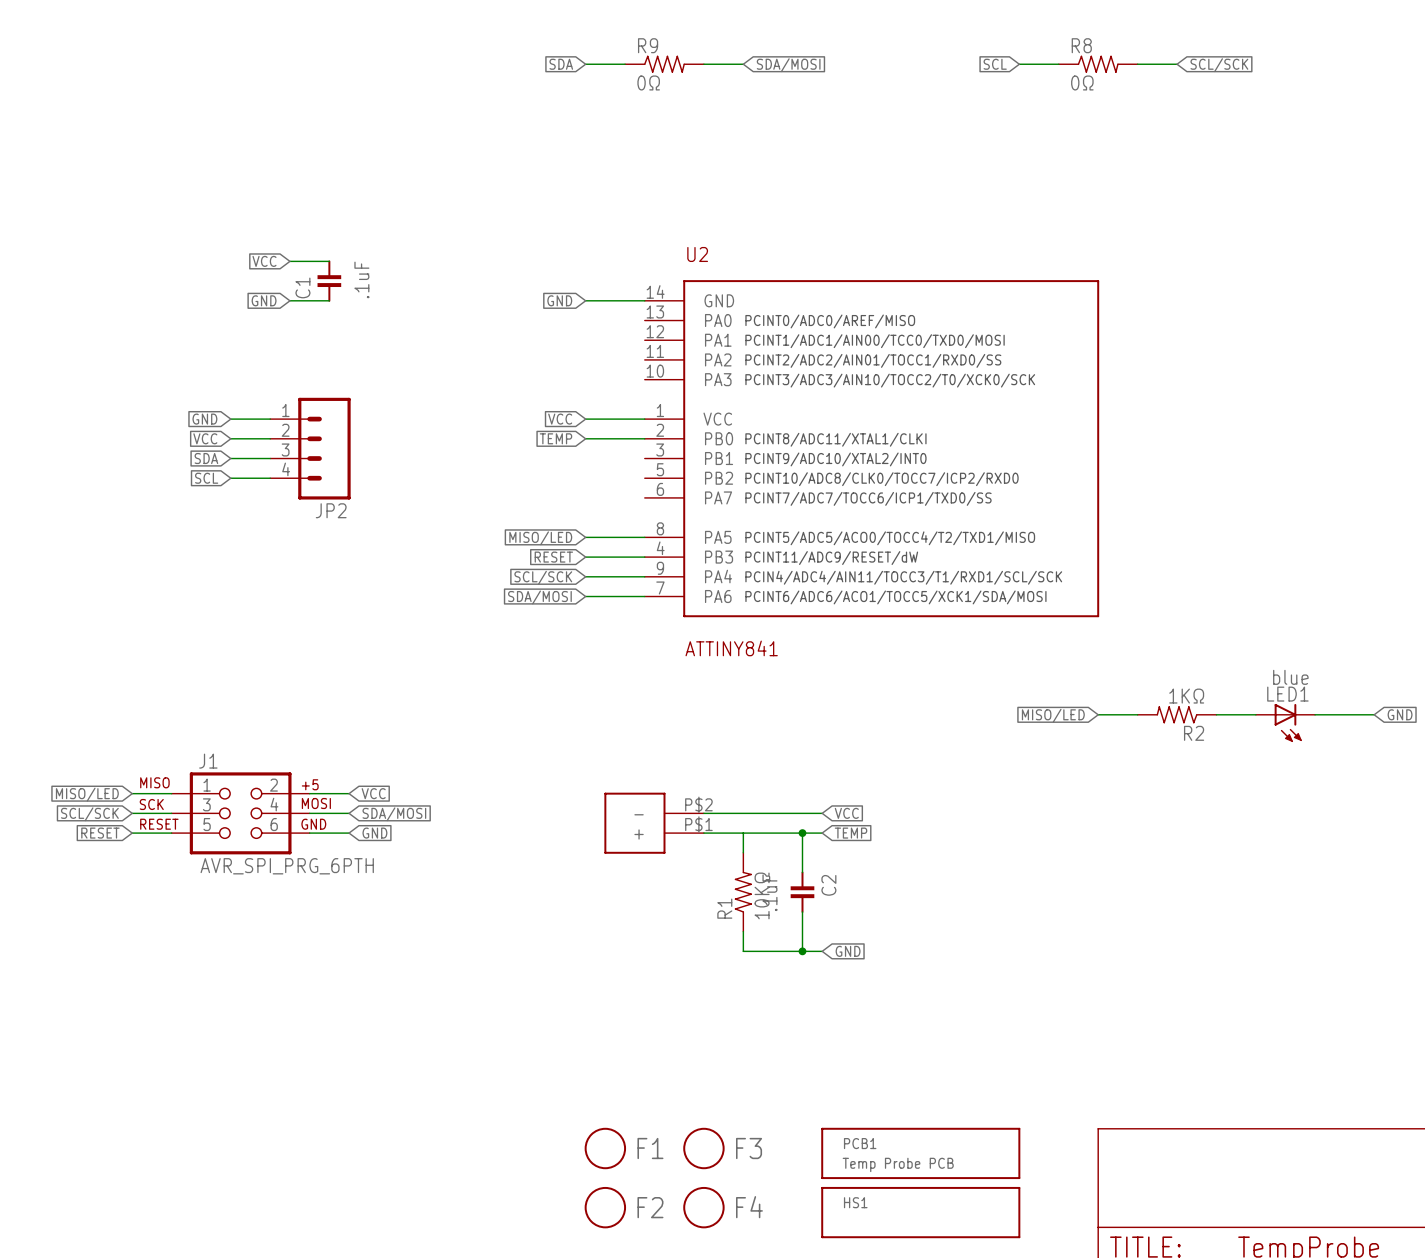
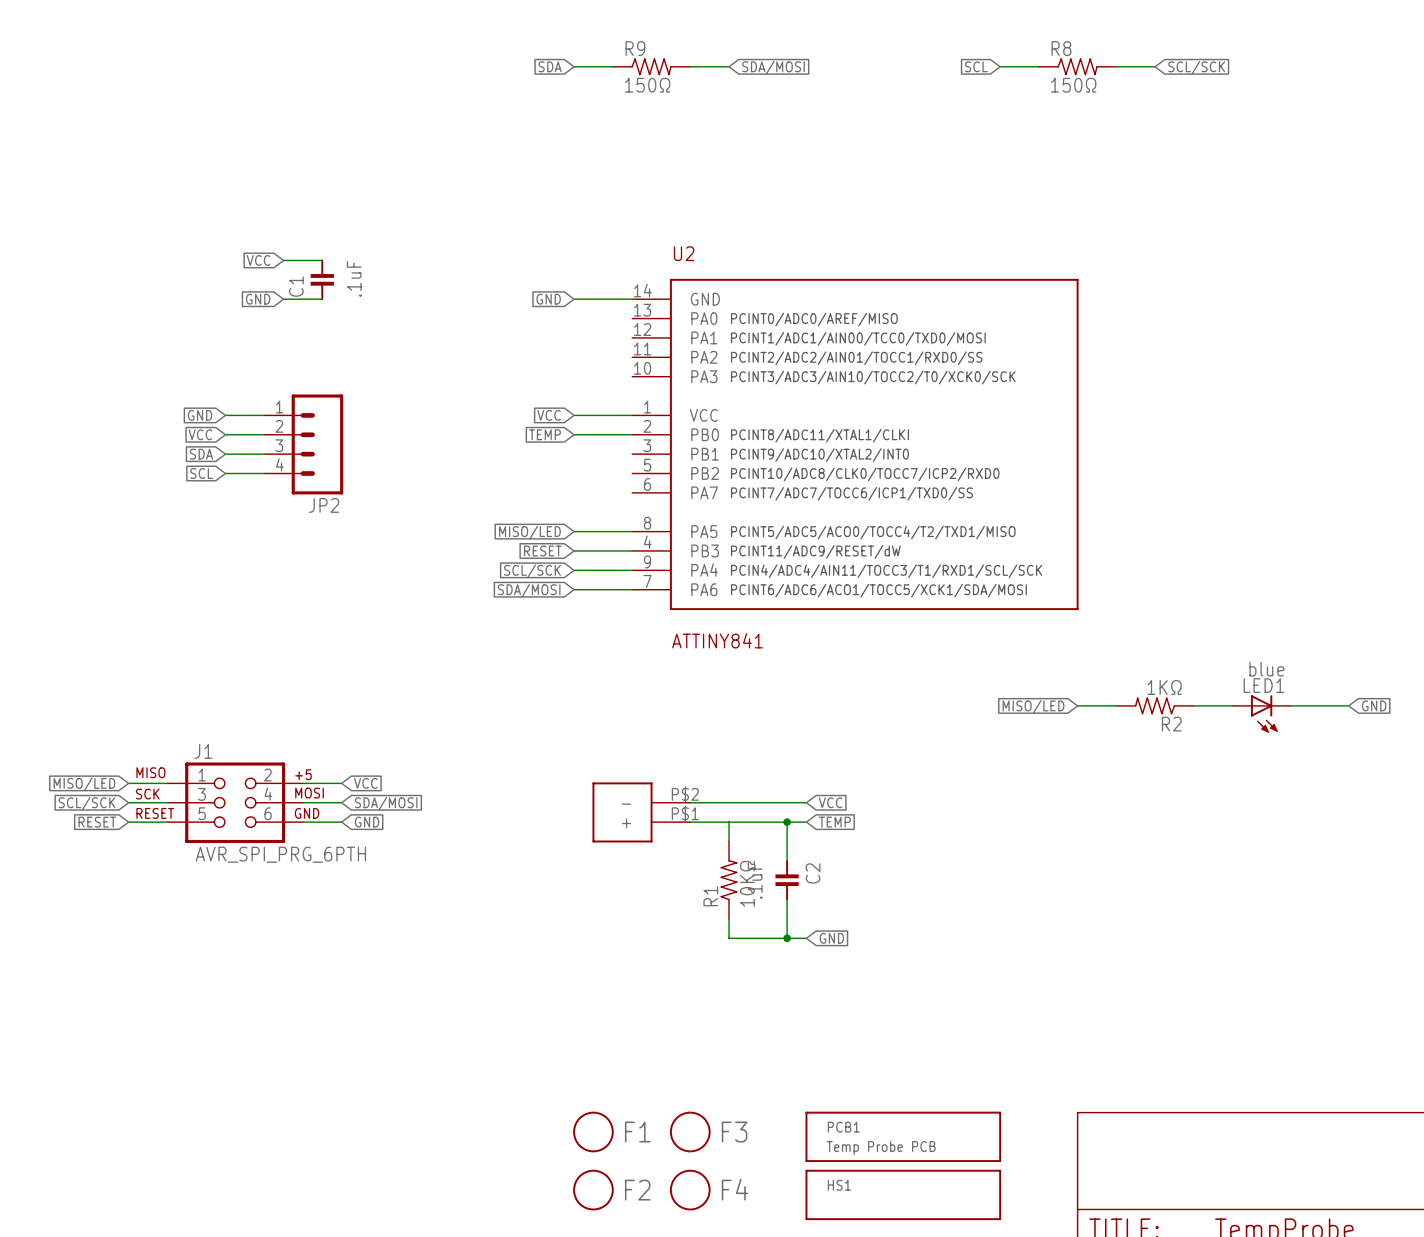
R9 value: 0Ω (648, 82) -> 150Ω (647, 85)
R8 value: 0Ω (1082, 82) -> 150Ω (1073, 85)

